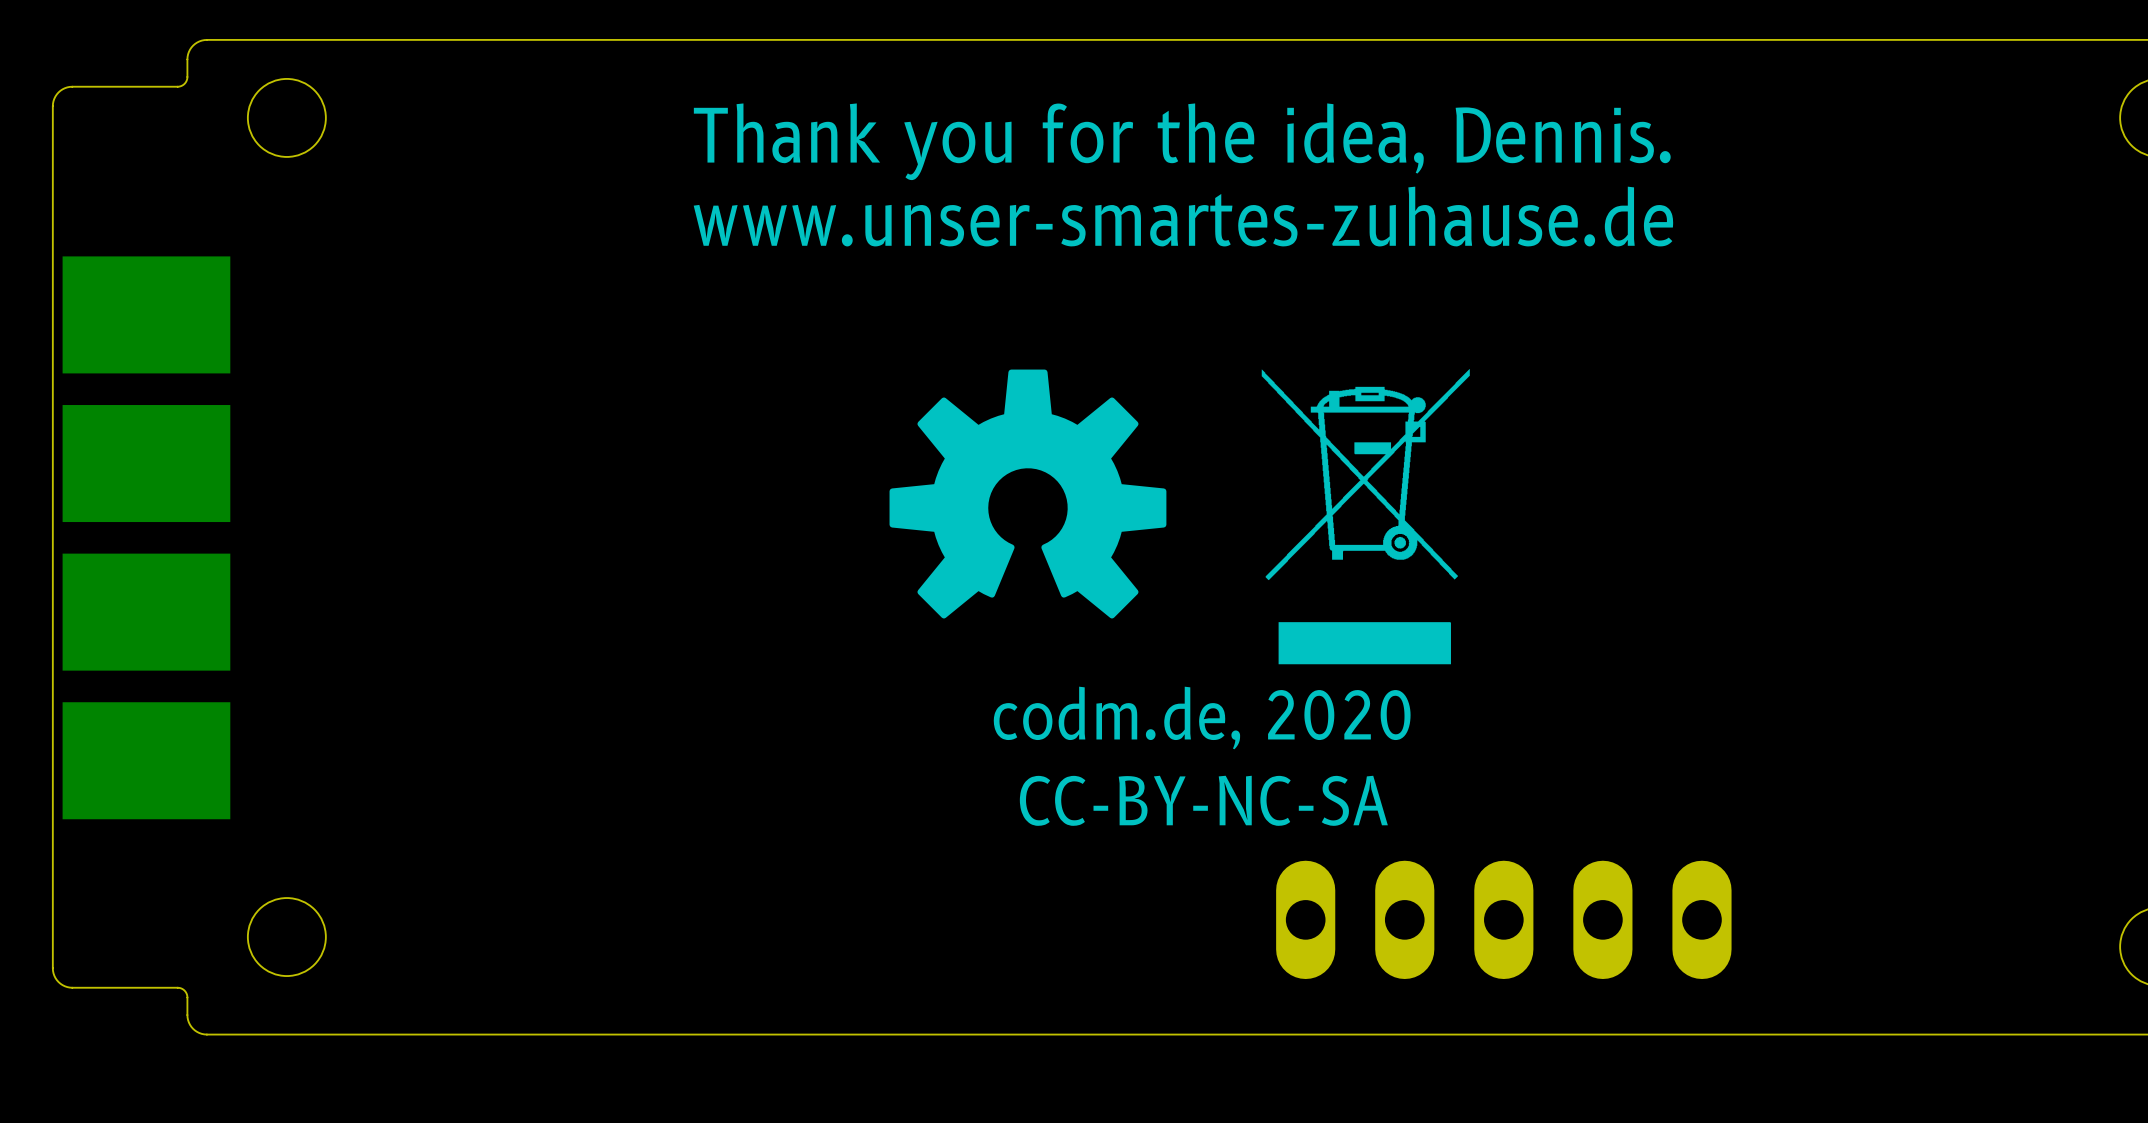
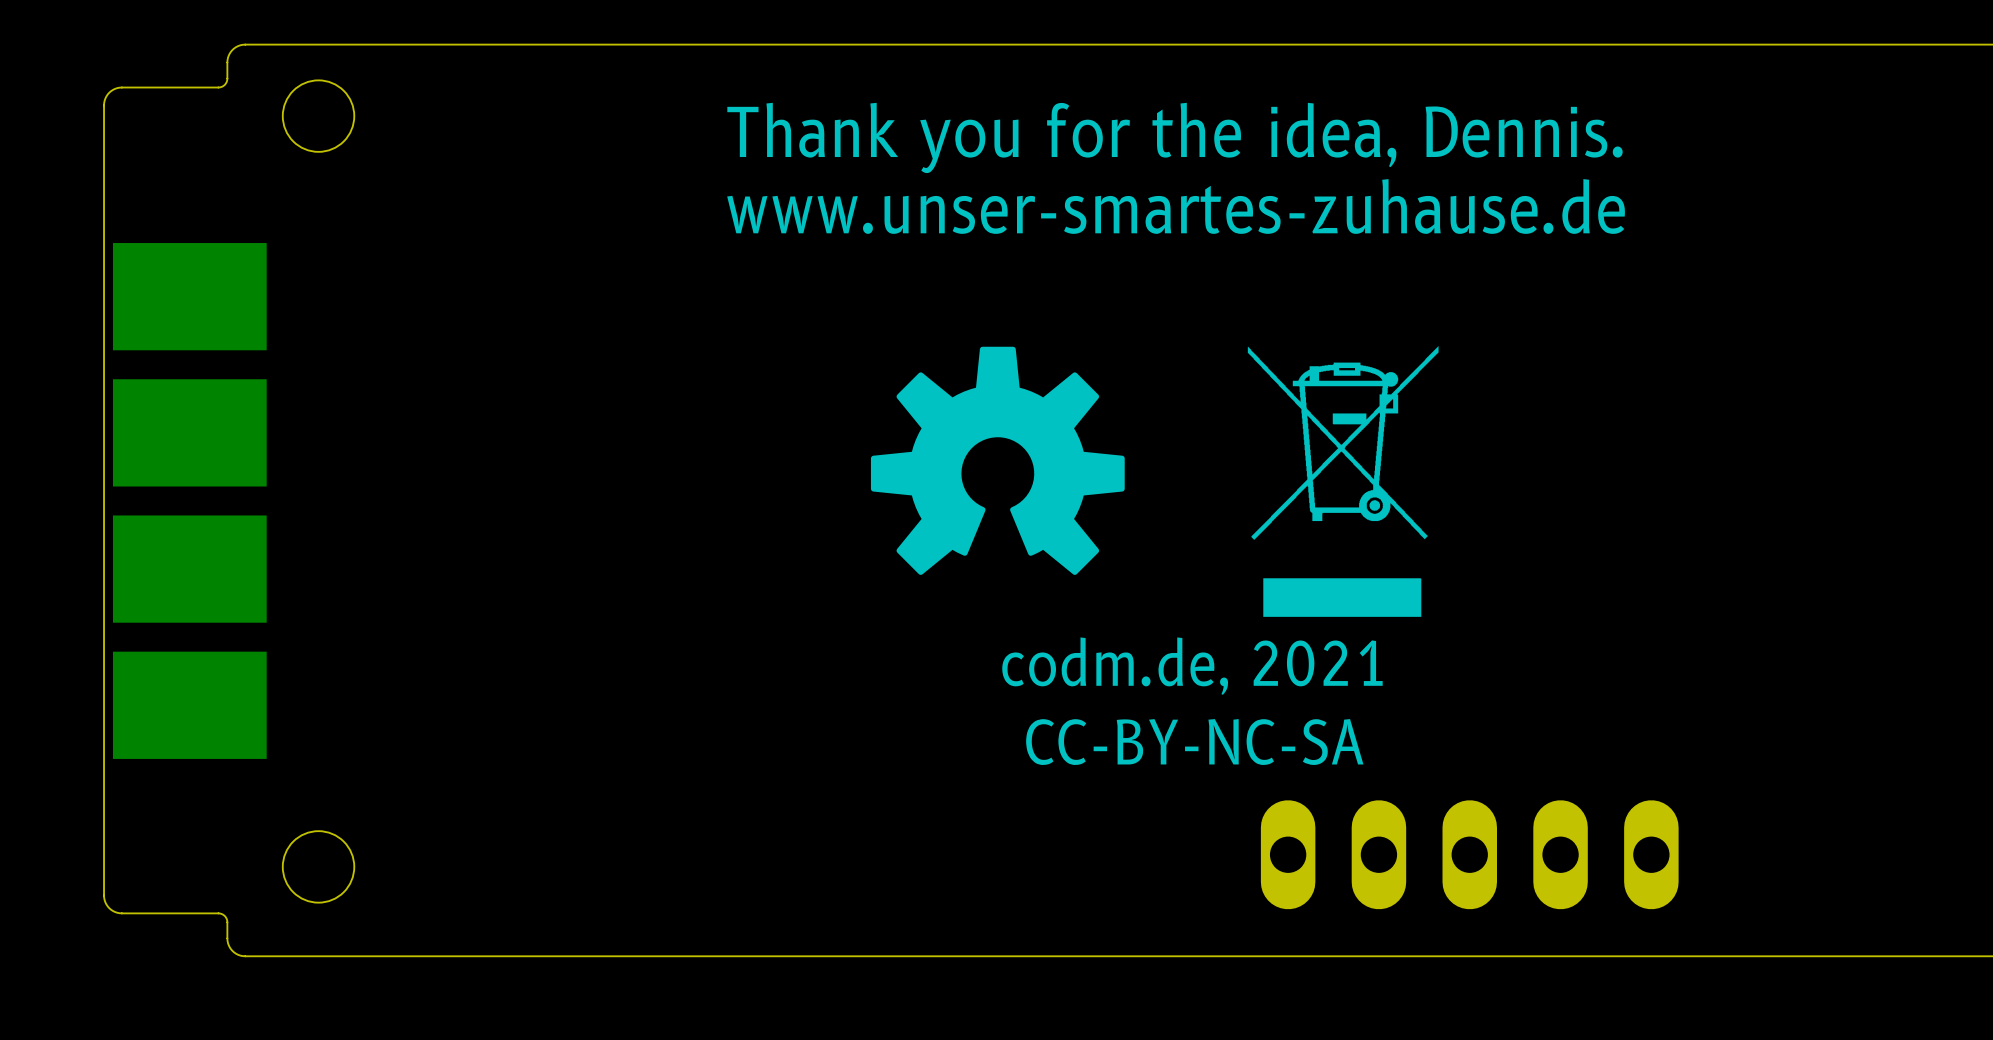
text position: Thank you for the idea, Dennis. (1182, 141) -> Thank you for the idea, Dennis. (1175, 137)
text position: www.unser-smartes-zuhause.de (1183, 216) -> www.unser-smartes-zuhause.de (1176, 206)
drawing position: (1365, 516) -> (1343, 481)
text: codm.de, 2020 (1202, 717) -> codm.de, 2021 (1192, 666)
text position: CC-BY-NC-SA (1203, 800) -> CC-BY-NC-SA (1194, 742)
part position: (1503, 919) -> (1469, 854)

